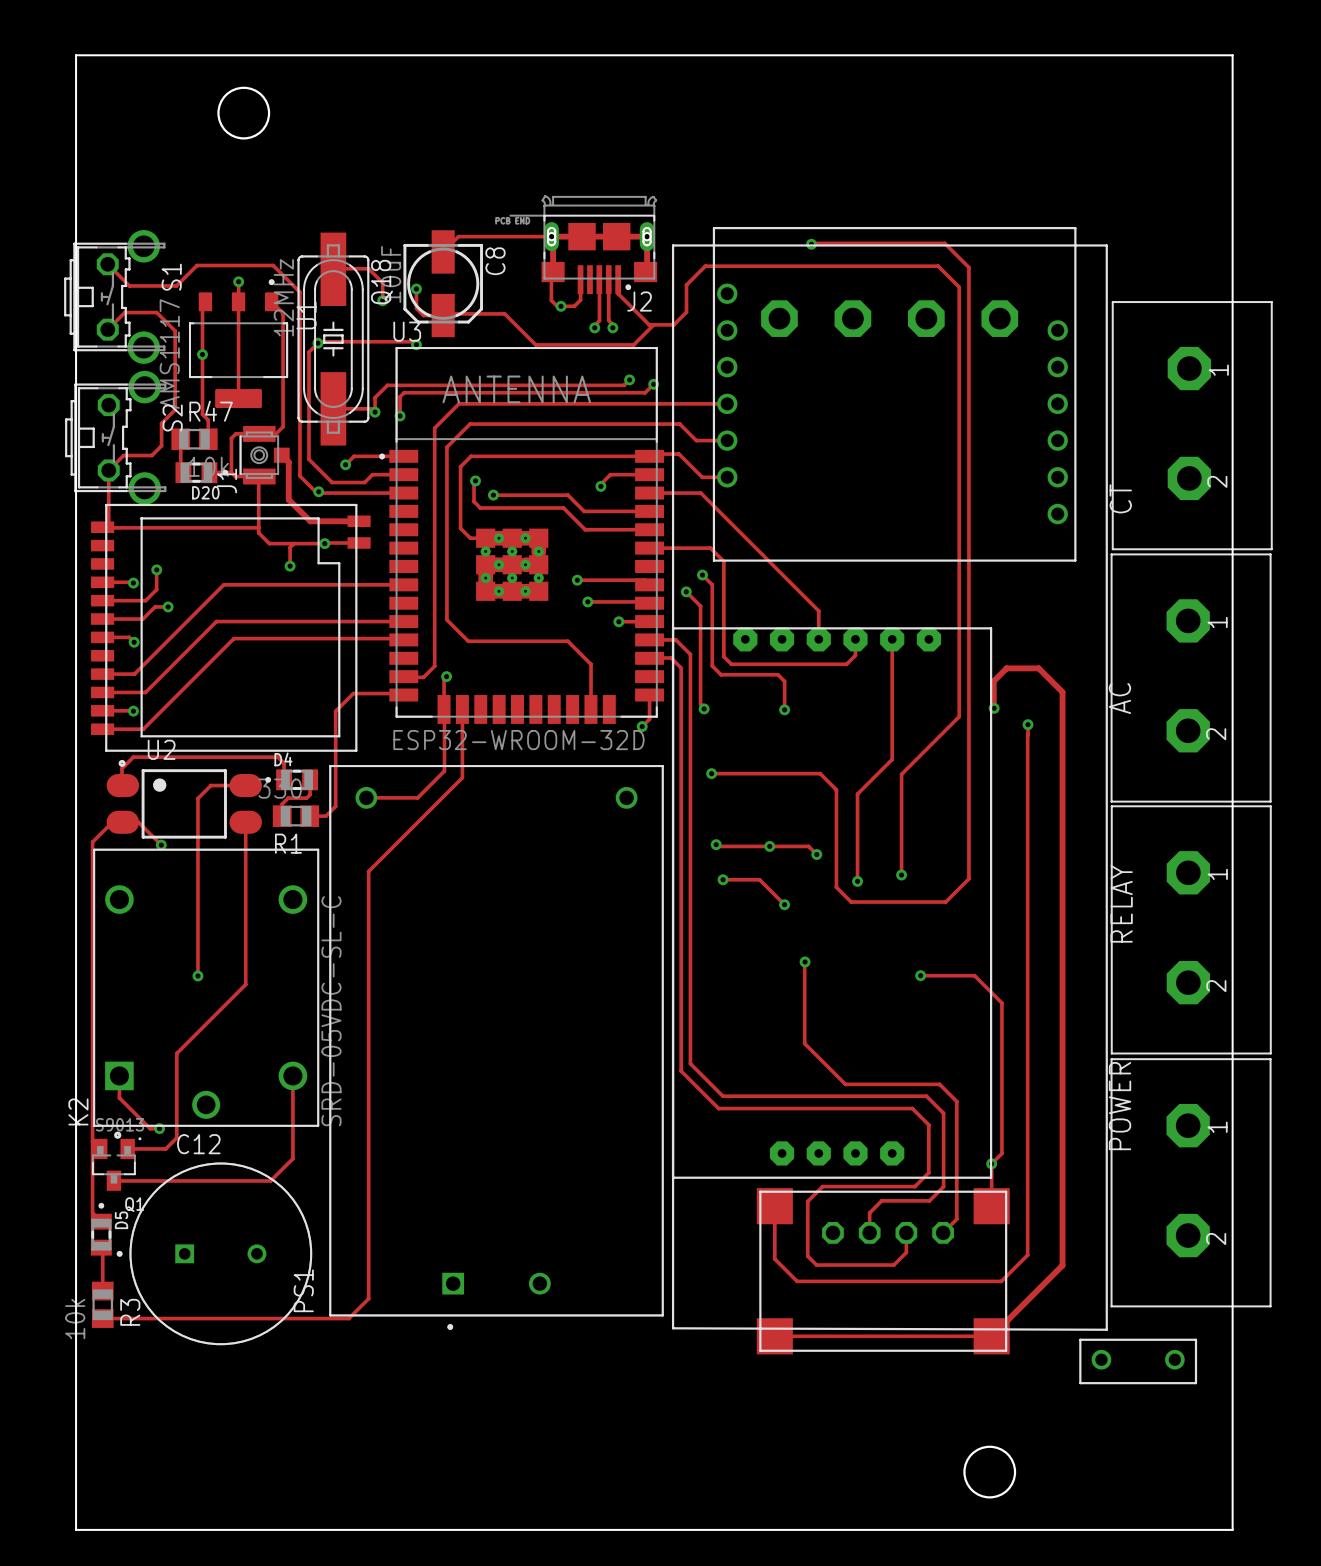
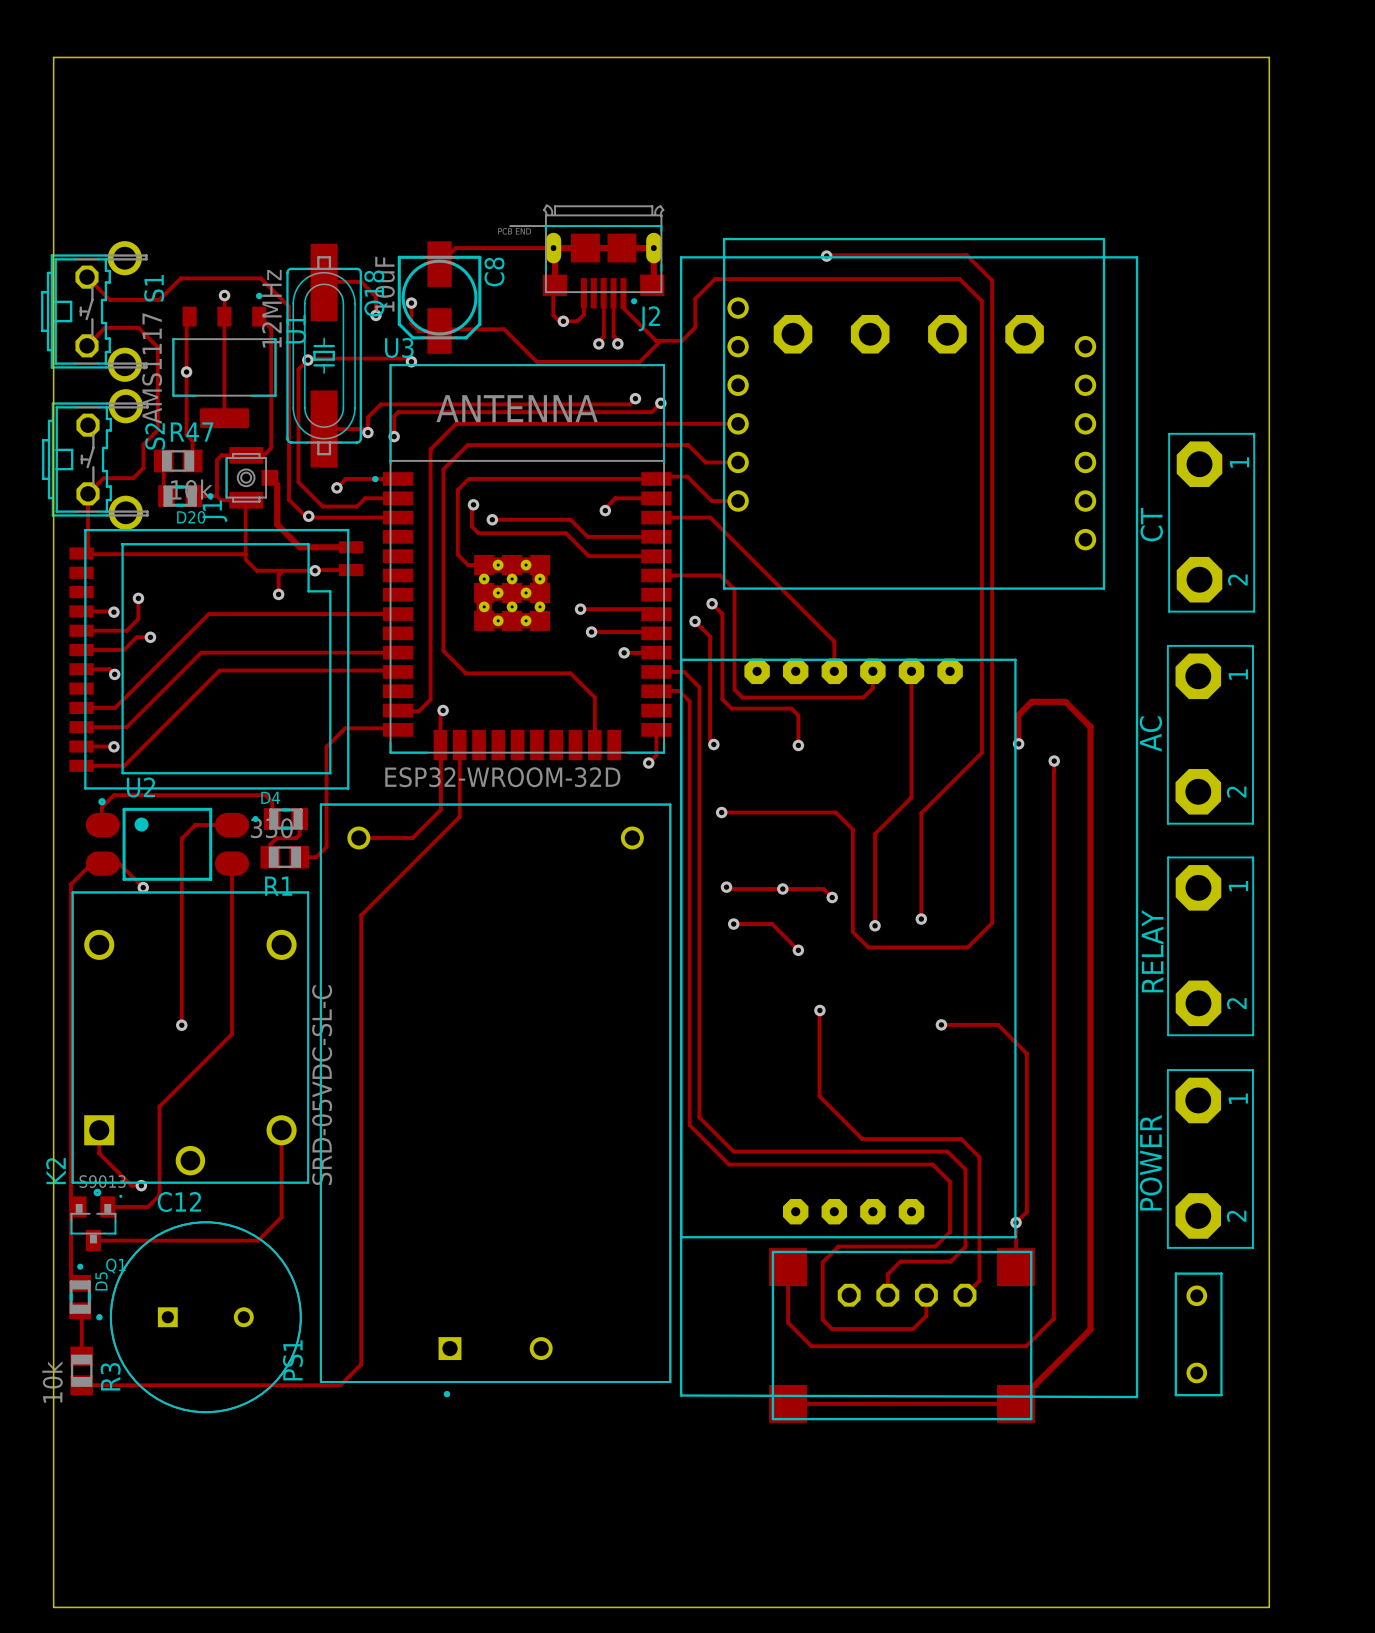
round board edge: [217, 86, 271, 140] -> none
part: (1192, 425) -> none
part: none -> (1211, 522)
part: (1191, 678) -> none
part: none -> (1210, 734)
part: none -> (1210, 946)
part: (1191, 929) -> none
part: none -> (1210, 1158)
part: (1191, 1182) -> none
part rotation: 0° (1138, 1361) -> 90° counterclockwise (1198, 1334)
part position: (1138, 1361) -> (1198, 1334)
round board edge: [963, 1445, 1017, 1499] -> none

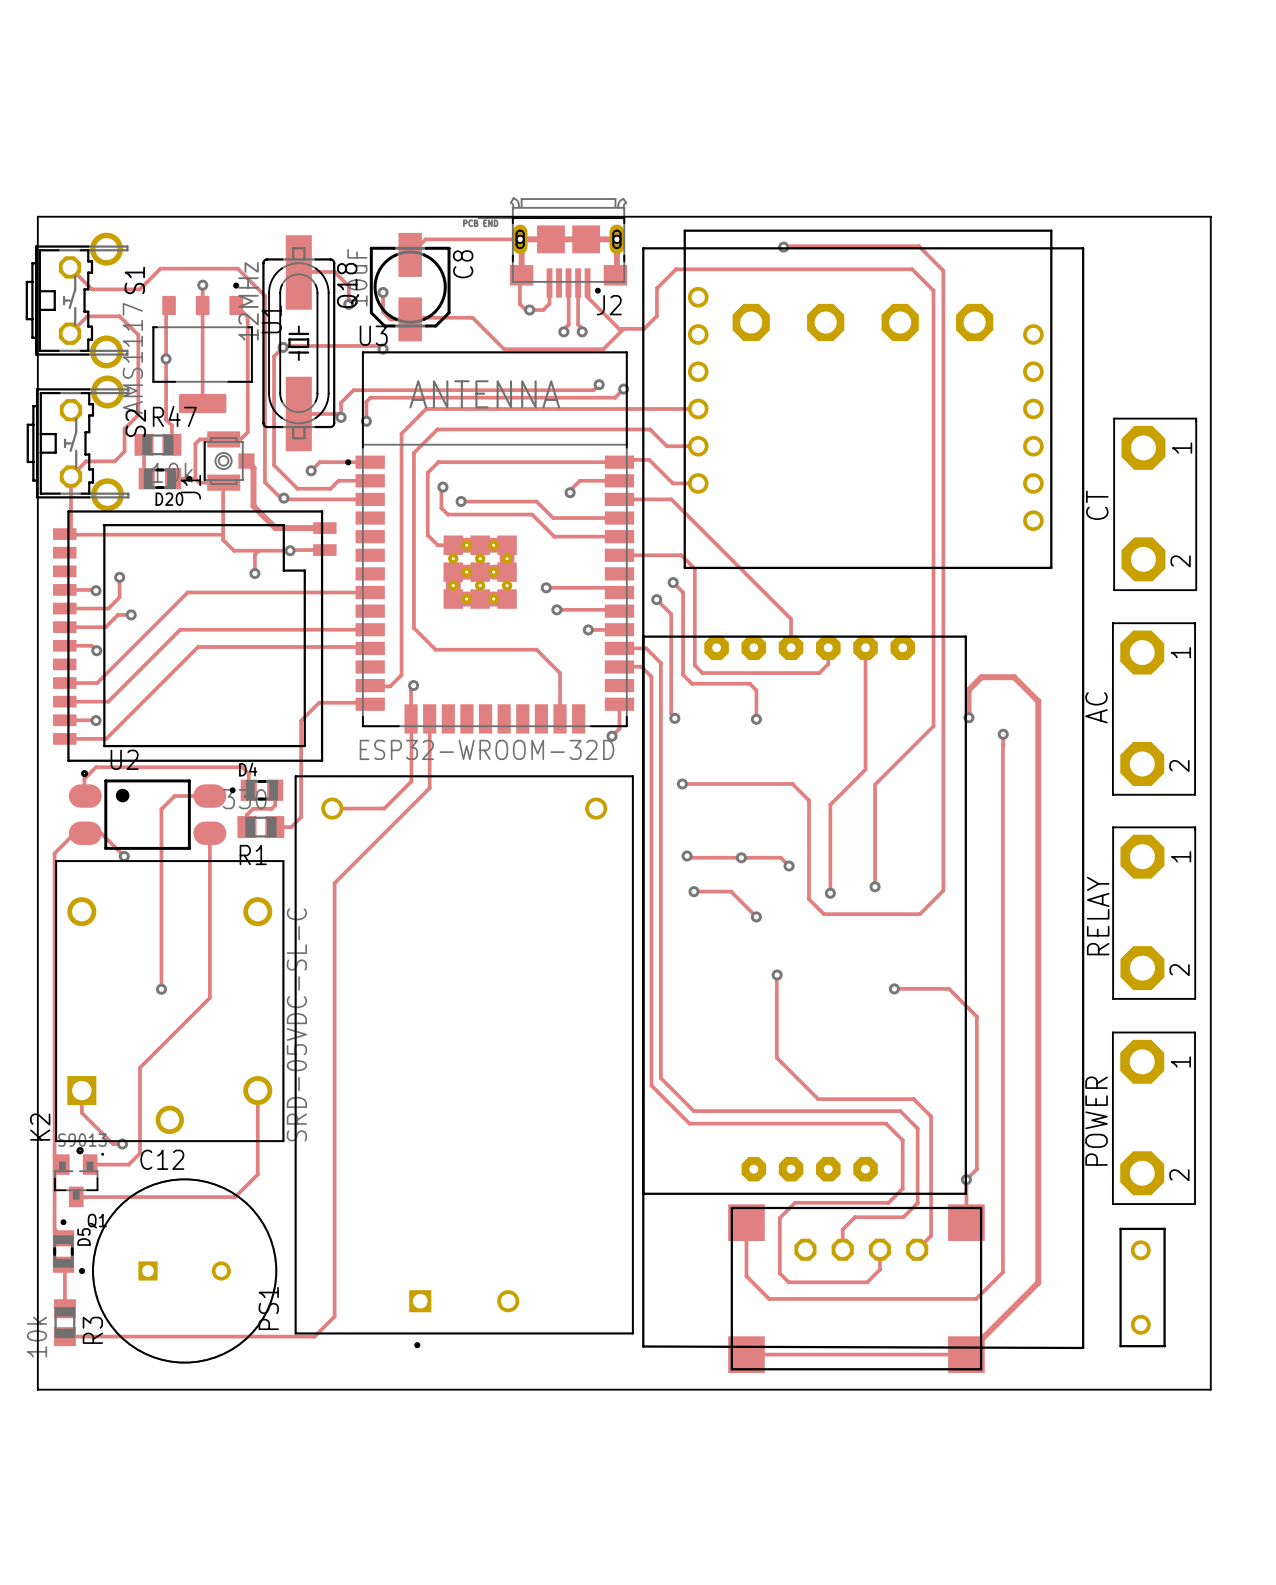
board edge: (53, 224) (53, 57) (1269, 57) (1269, 224) -> (37, 216) (1210, 216)
board edge: (53, 1440) (53, 1607) (1269, 1607) (1269, 1440) -> (37, 1389) (1210, 1389)

